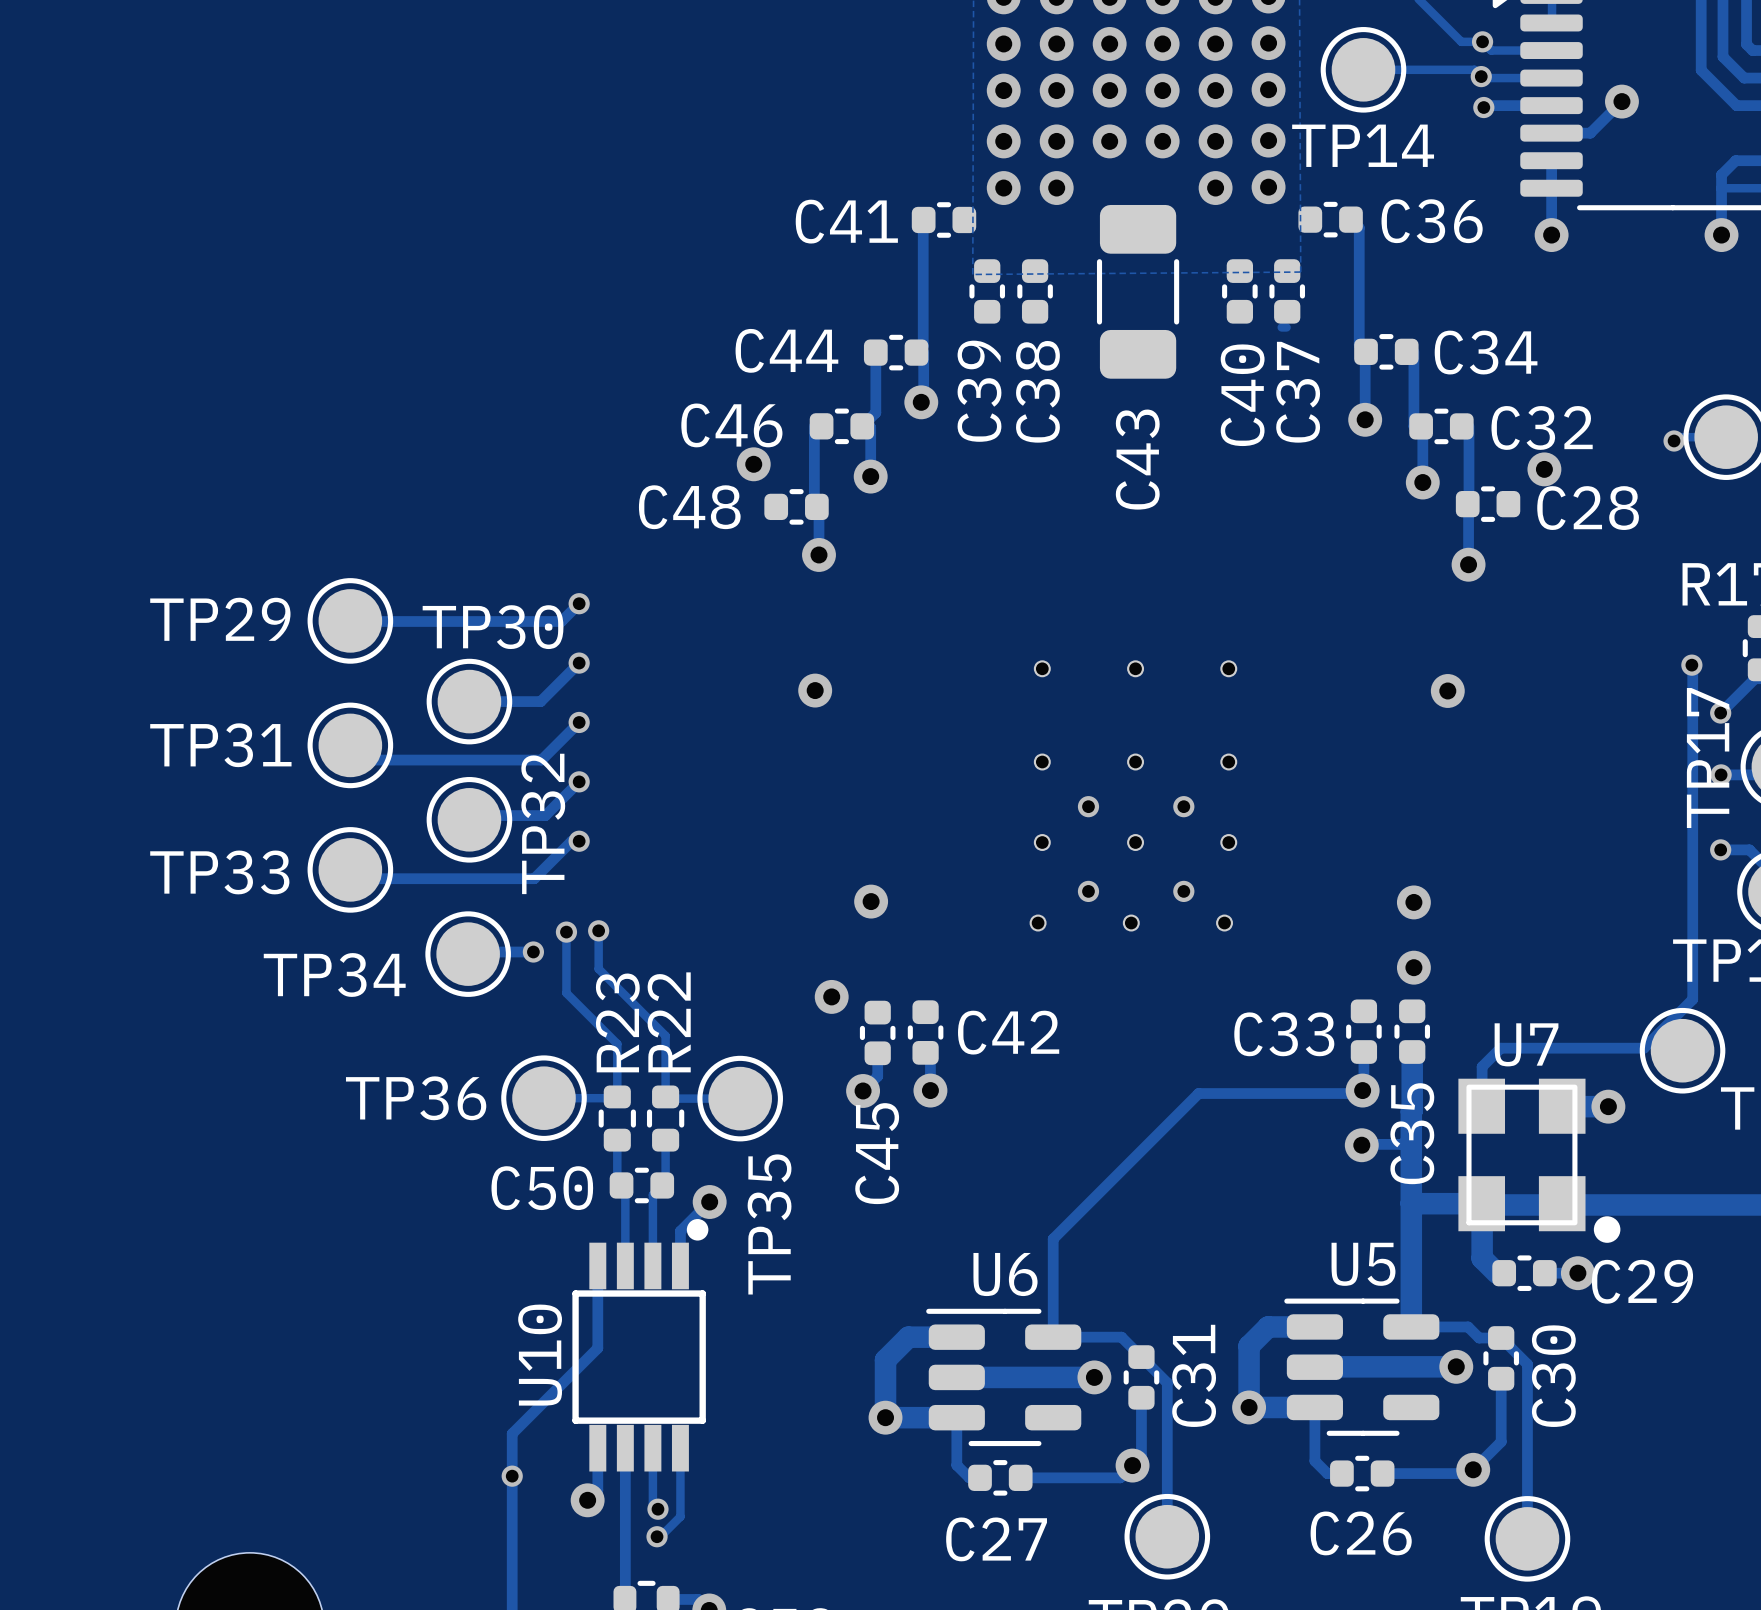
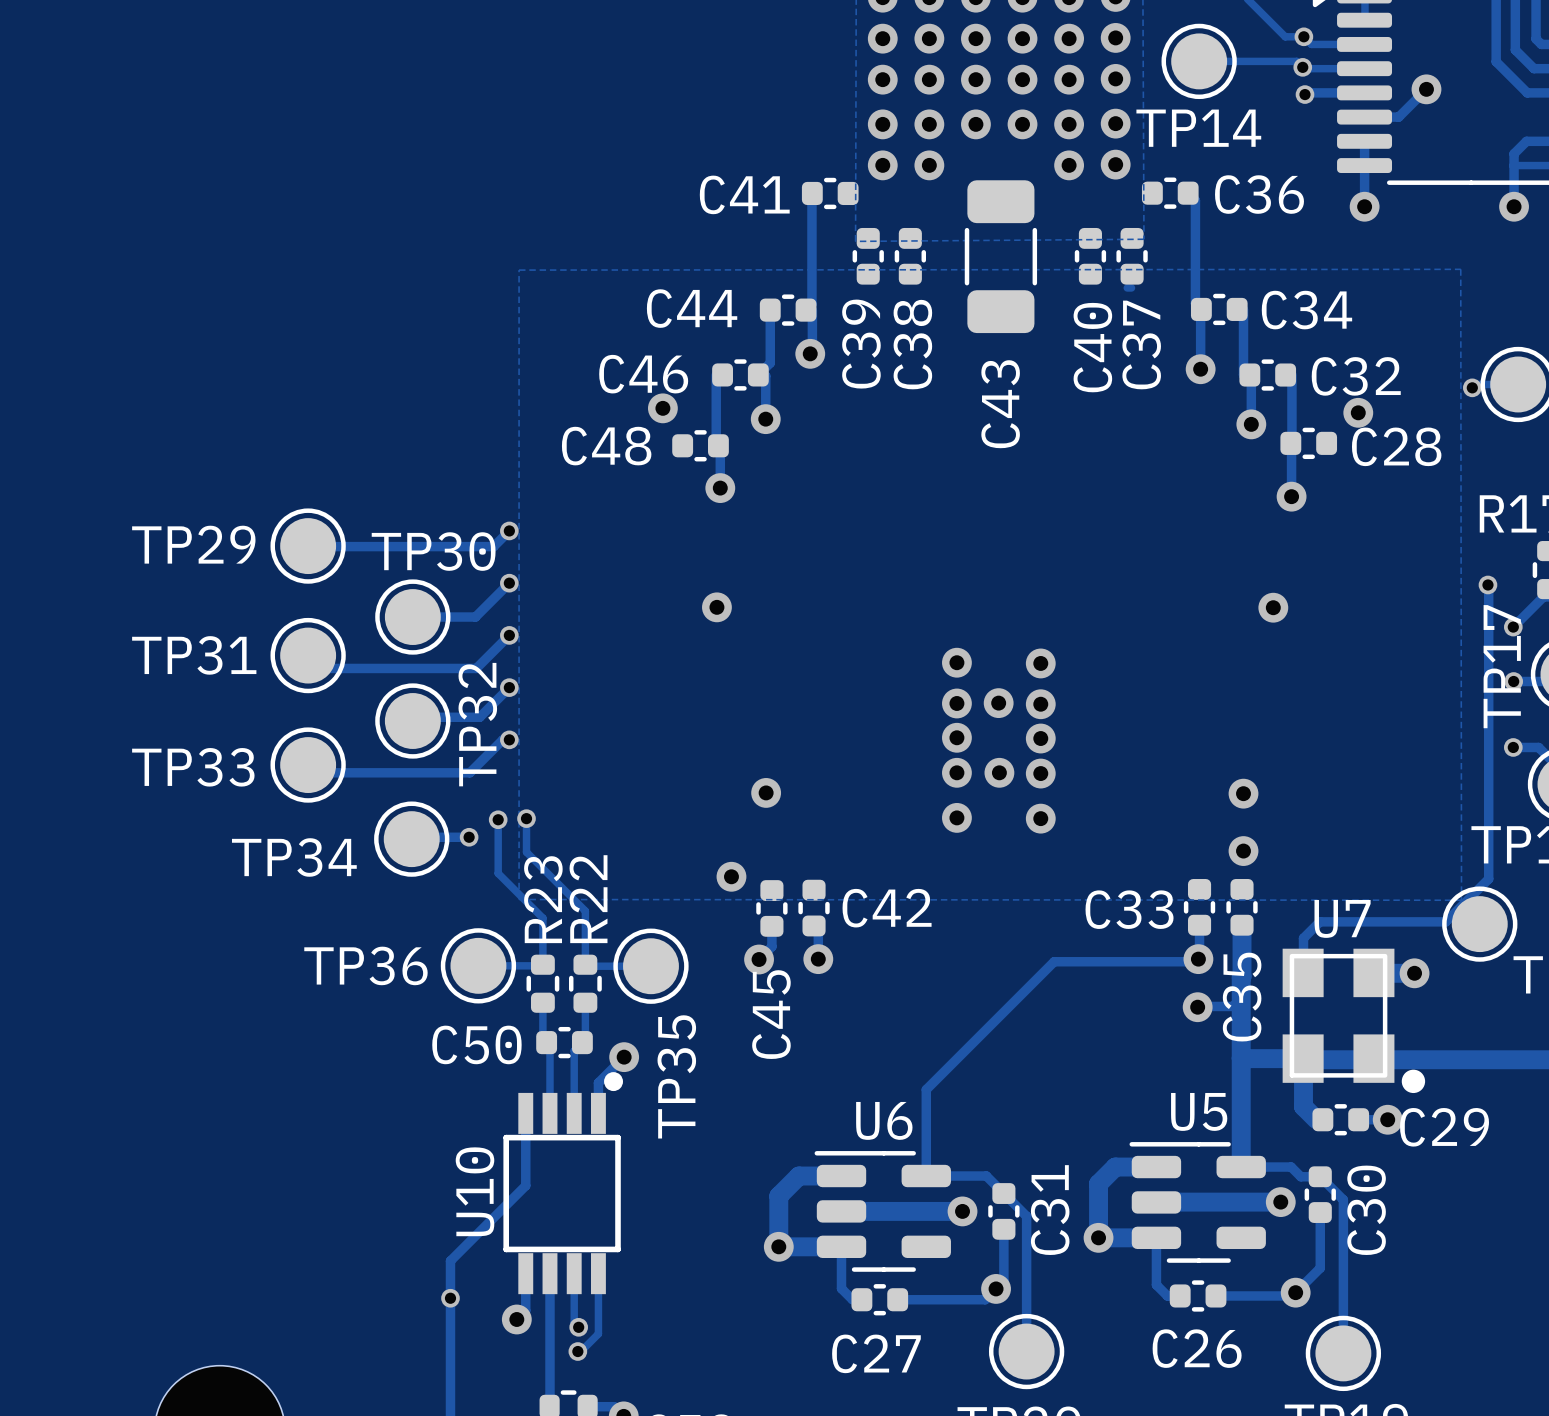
zone outline: none -> (1460, 269) (519, 270) (519, 899) (1461, 900) (1460, 269)
via: none -> (956, 662)
via: none -> (1040, 663)
part: (1133, 795) -> none
via size: [1077, 796, 1100, 818] -> [942, 688, 972, 719]
via size: [1173, 796, 1195, 818] -> [1025, 689, 1056, 720]
via: none -> (998, 703)
via: none -> (956, 737)
via: none -> (1040, 738)
via: none -> (999, 772)
via size: [1077, 880, 1100, 903] -> [942, 757, 972, 788]
via size: [1173, 880, 1195, 903] -> [1025, 758, 1056, 789]
via: none -> (956, 817)
via: none -> (1040, 818)

